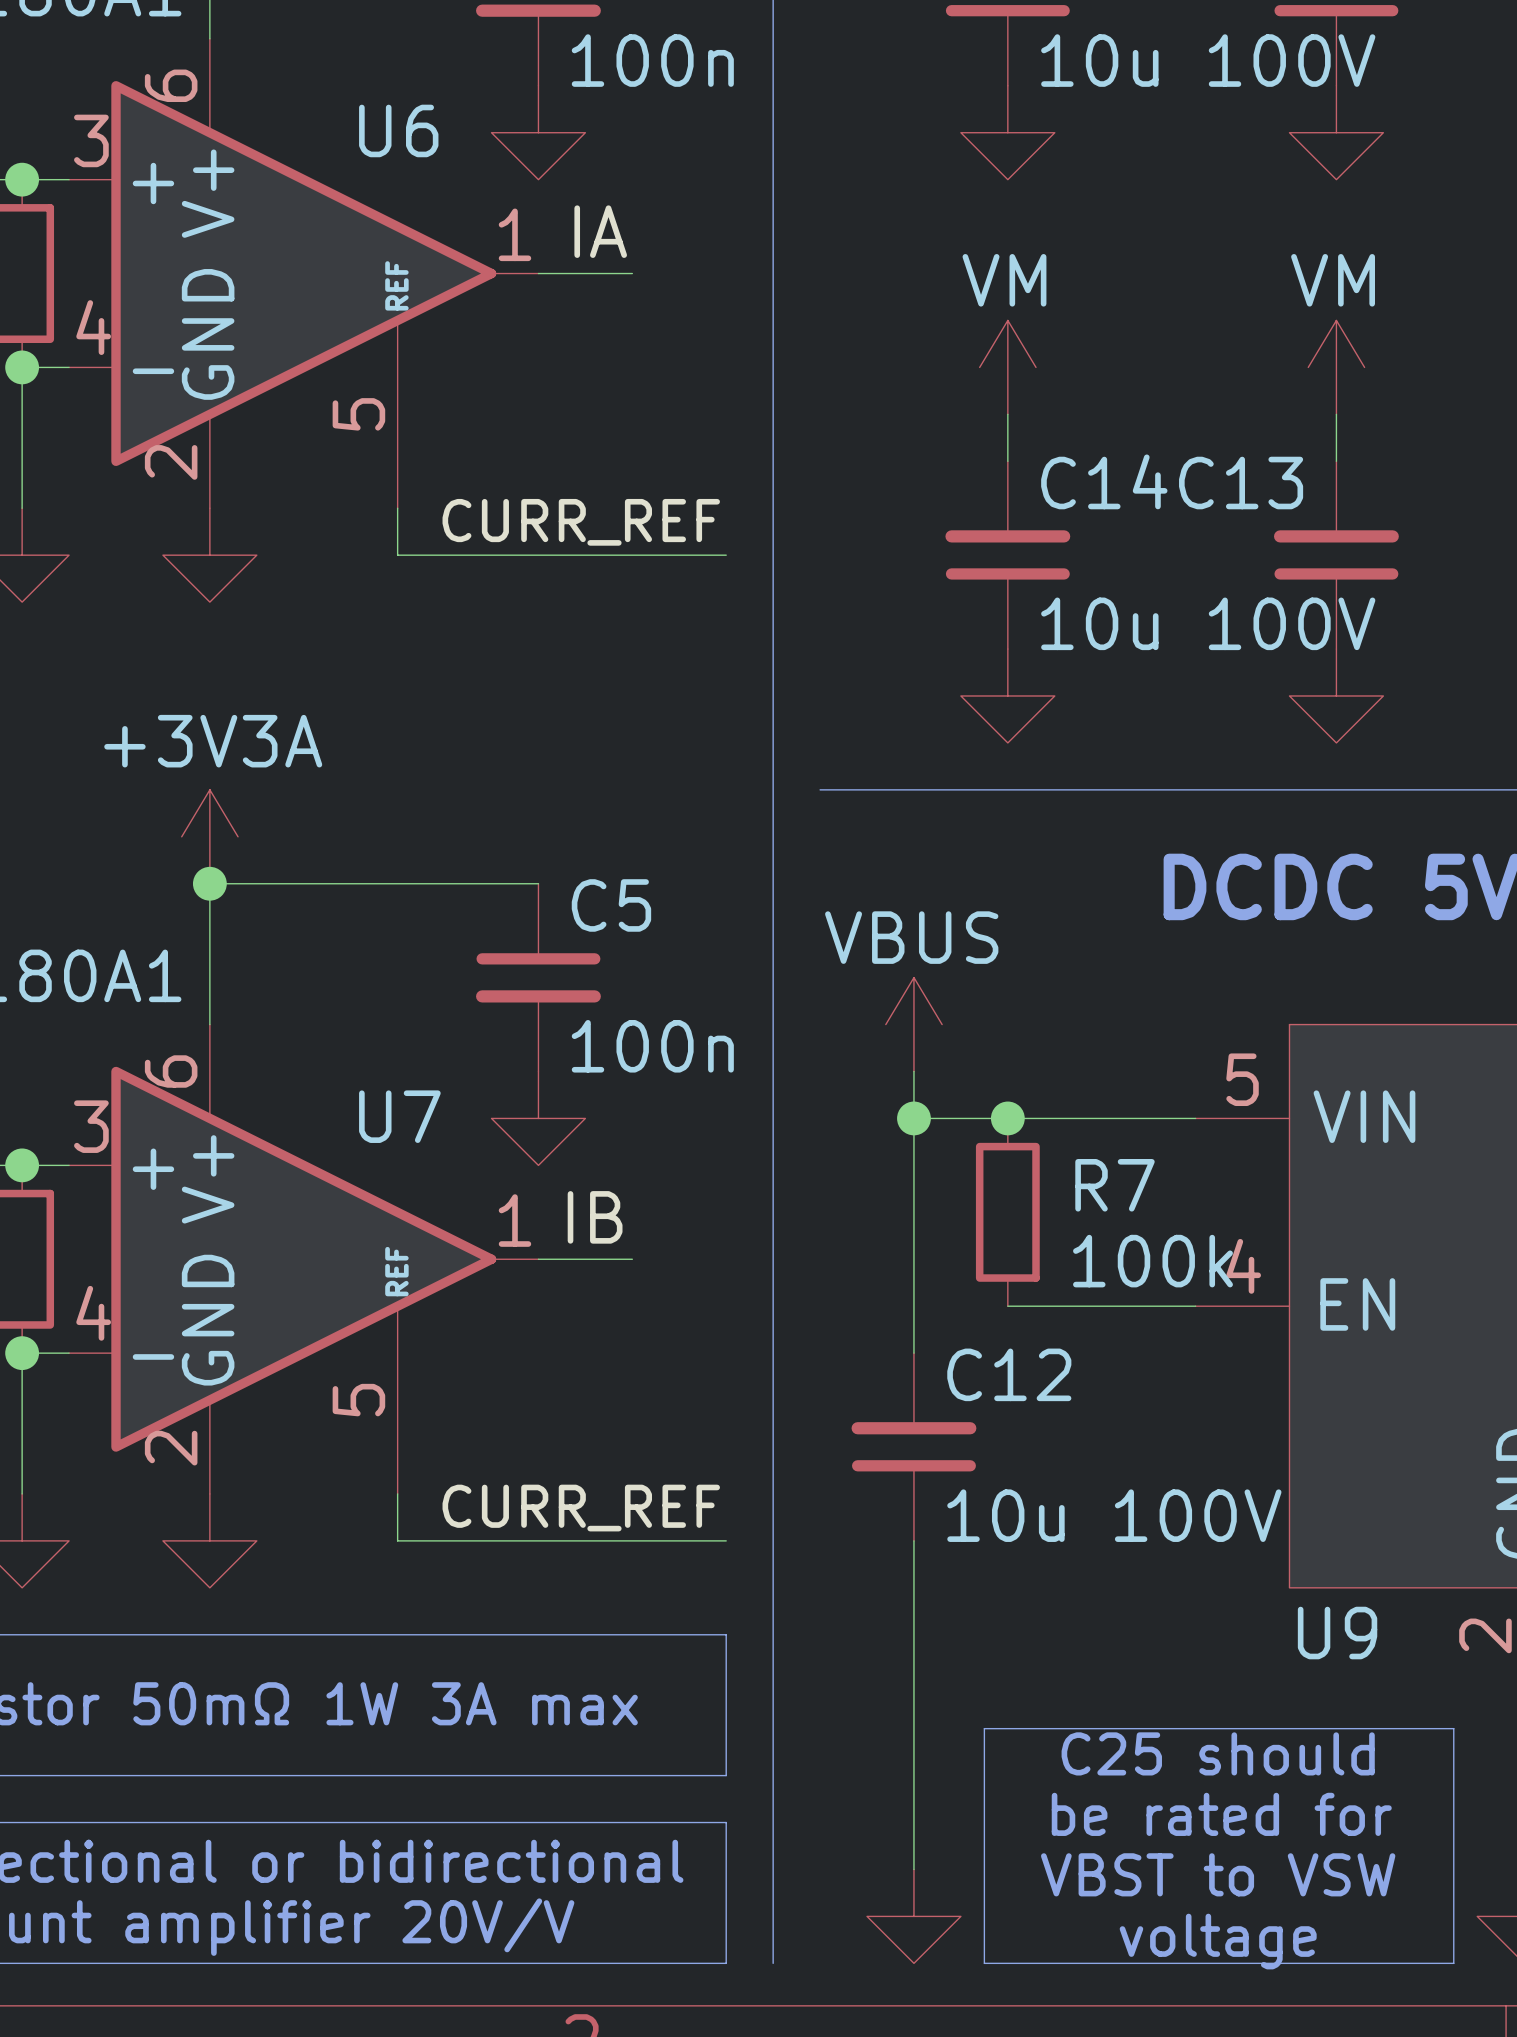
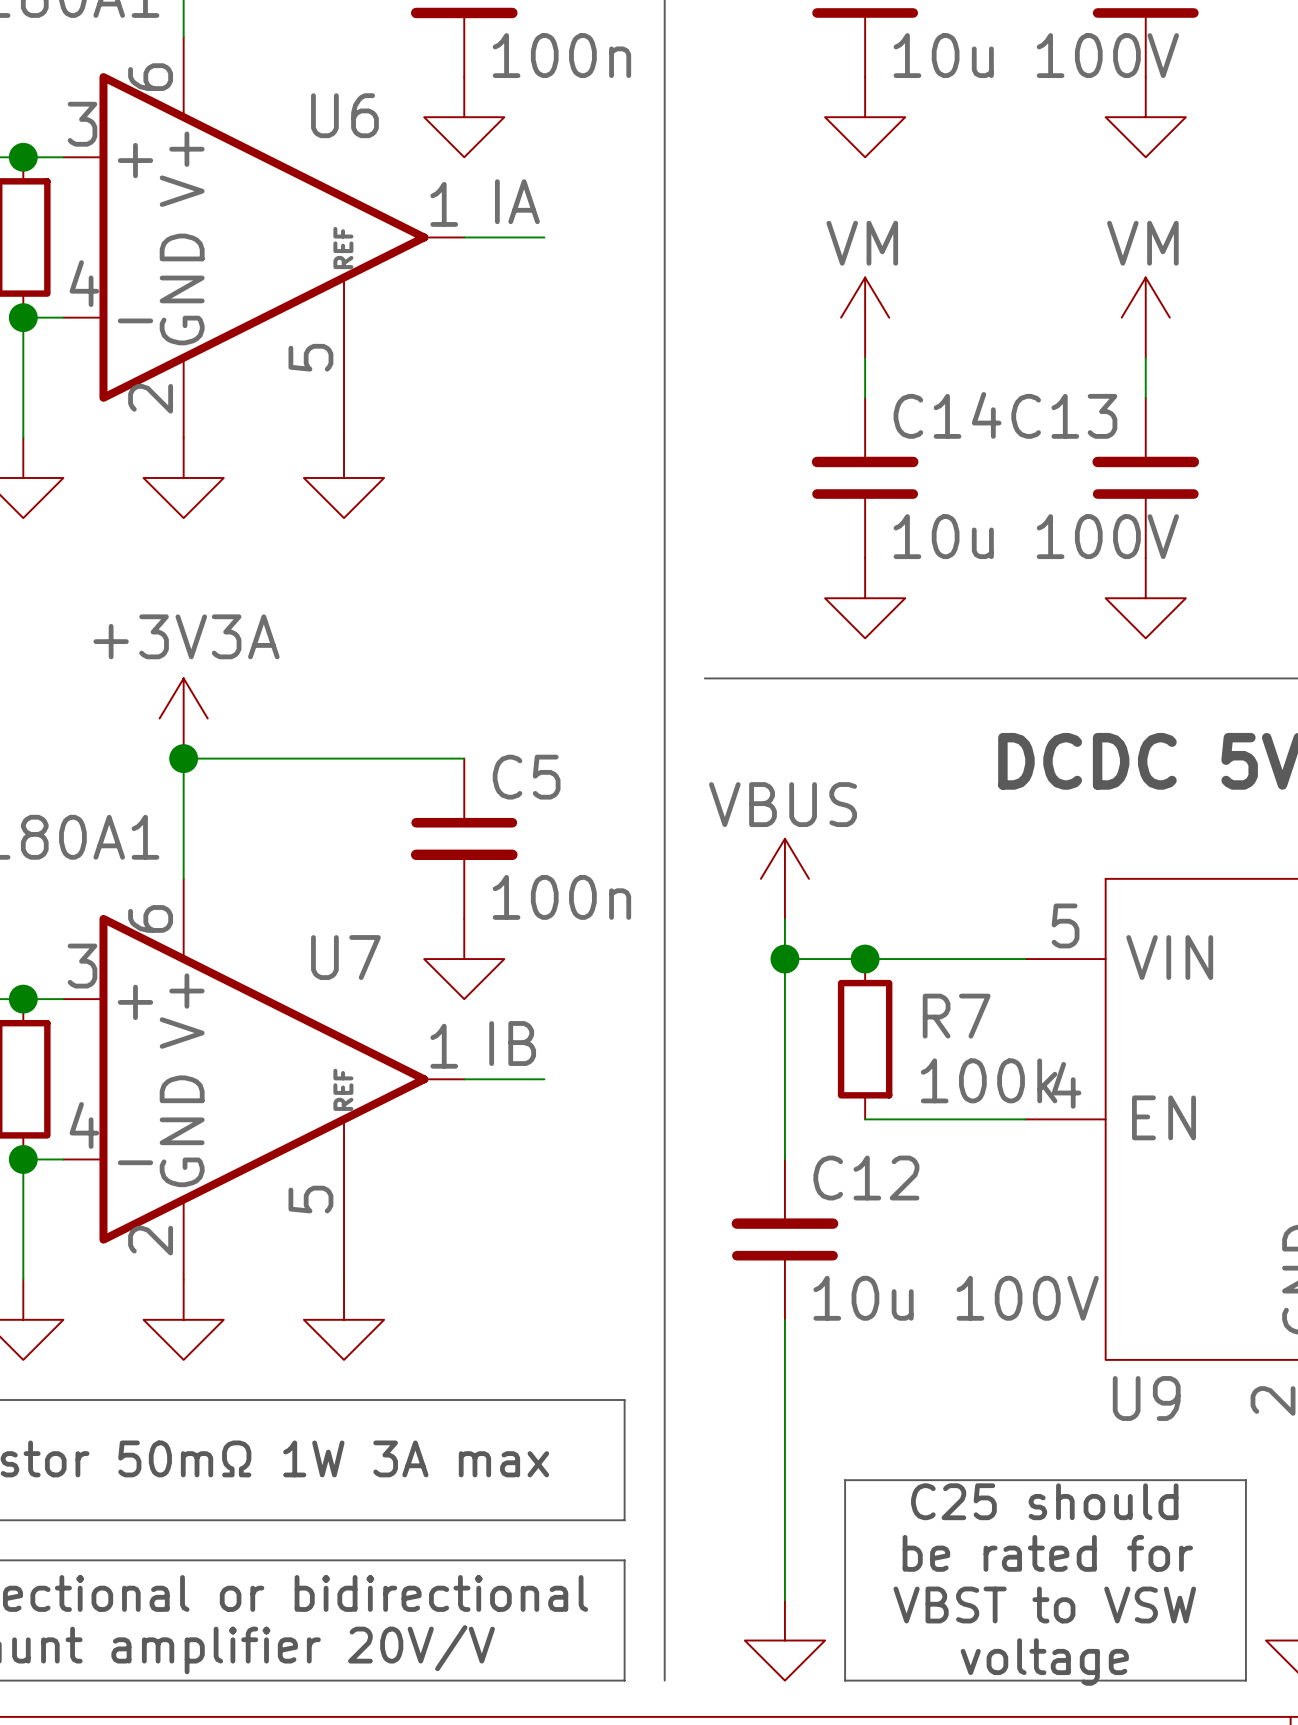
wire: (397, 508) (397, 555) (726, 555) -> none
label: CURR_REF (581, 522) -> none
power symbol: none -> (344, 477)
wire: (397, 1493) (397, 1540) (726, 1540) -> none
label: CURR_REF (581, 1508) -> none
power symbol: none -> (344, 1319)

